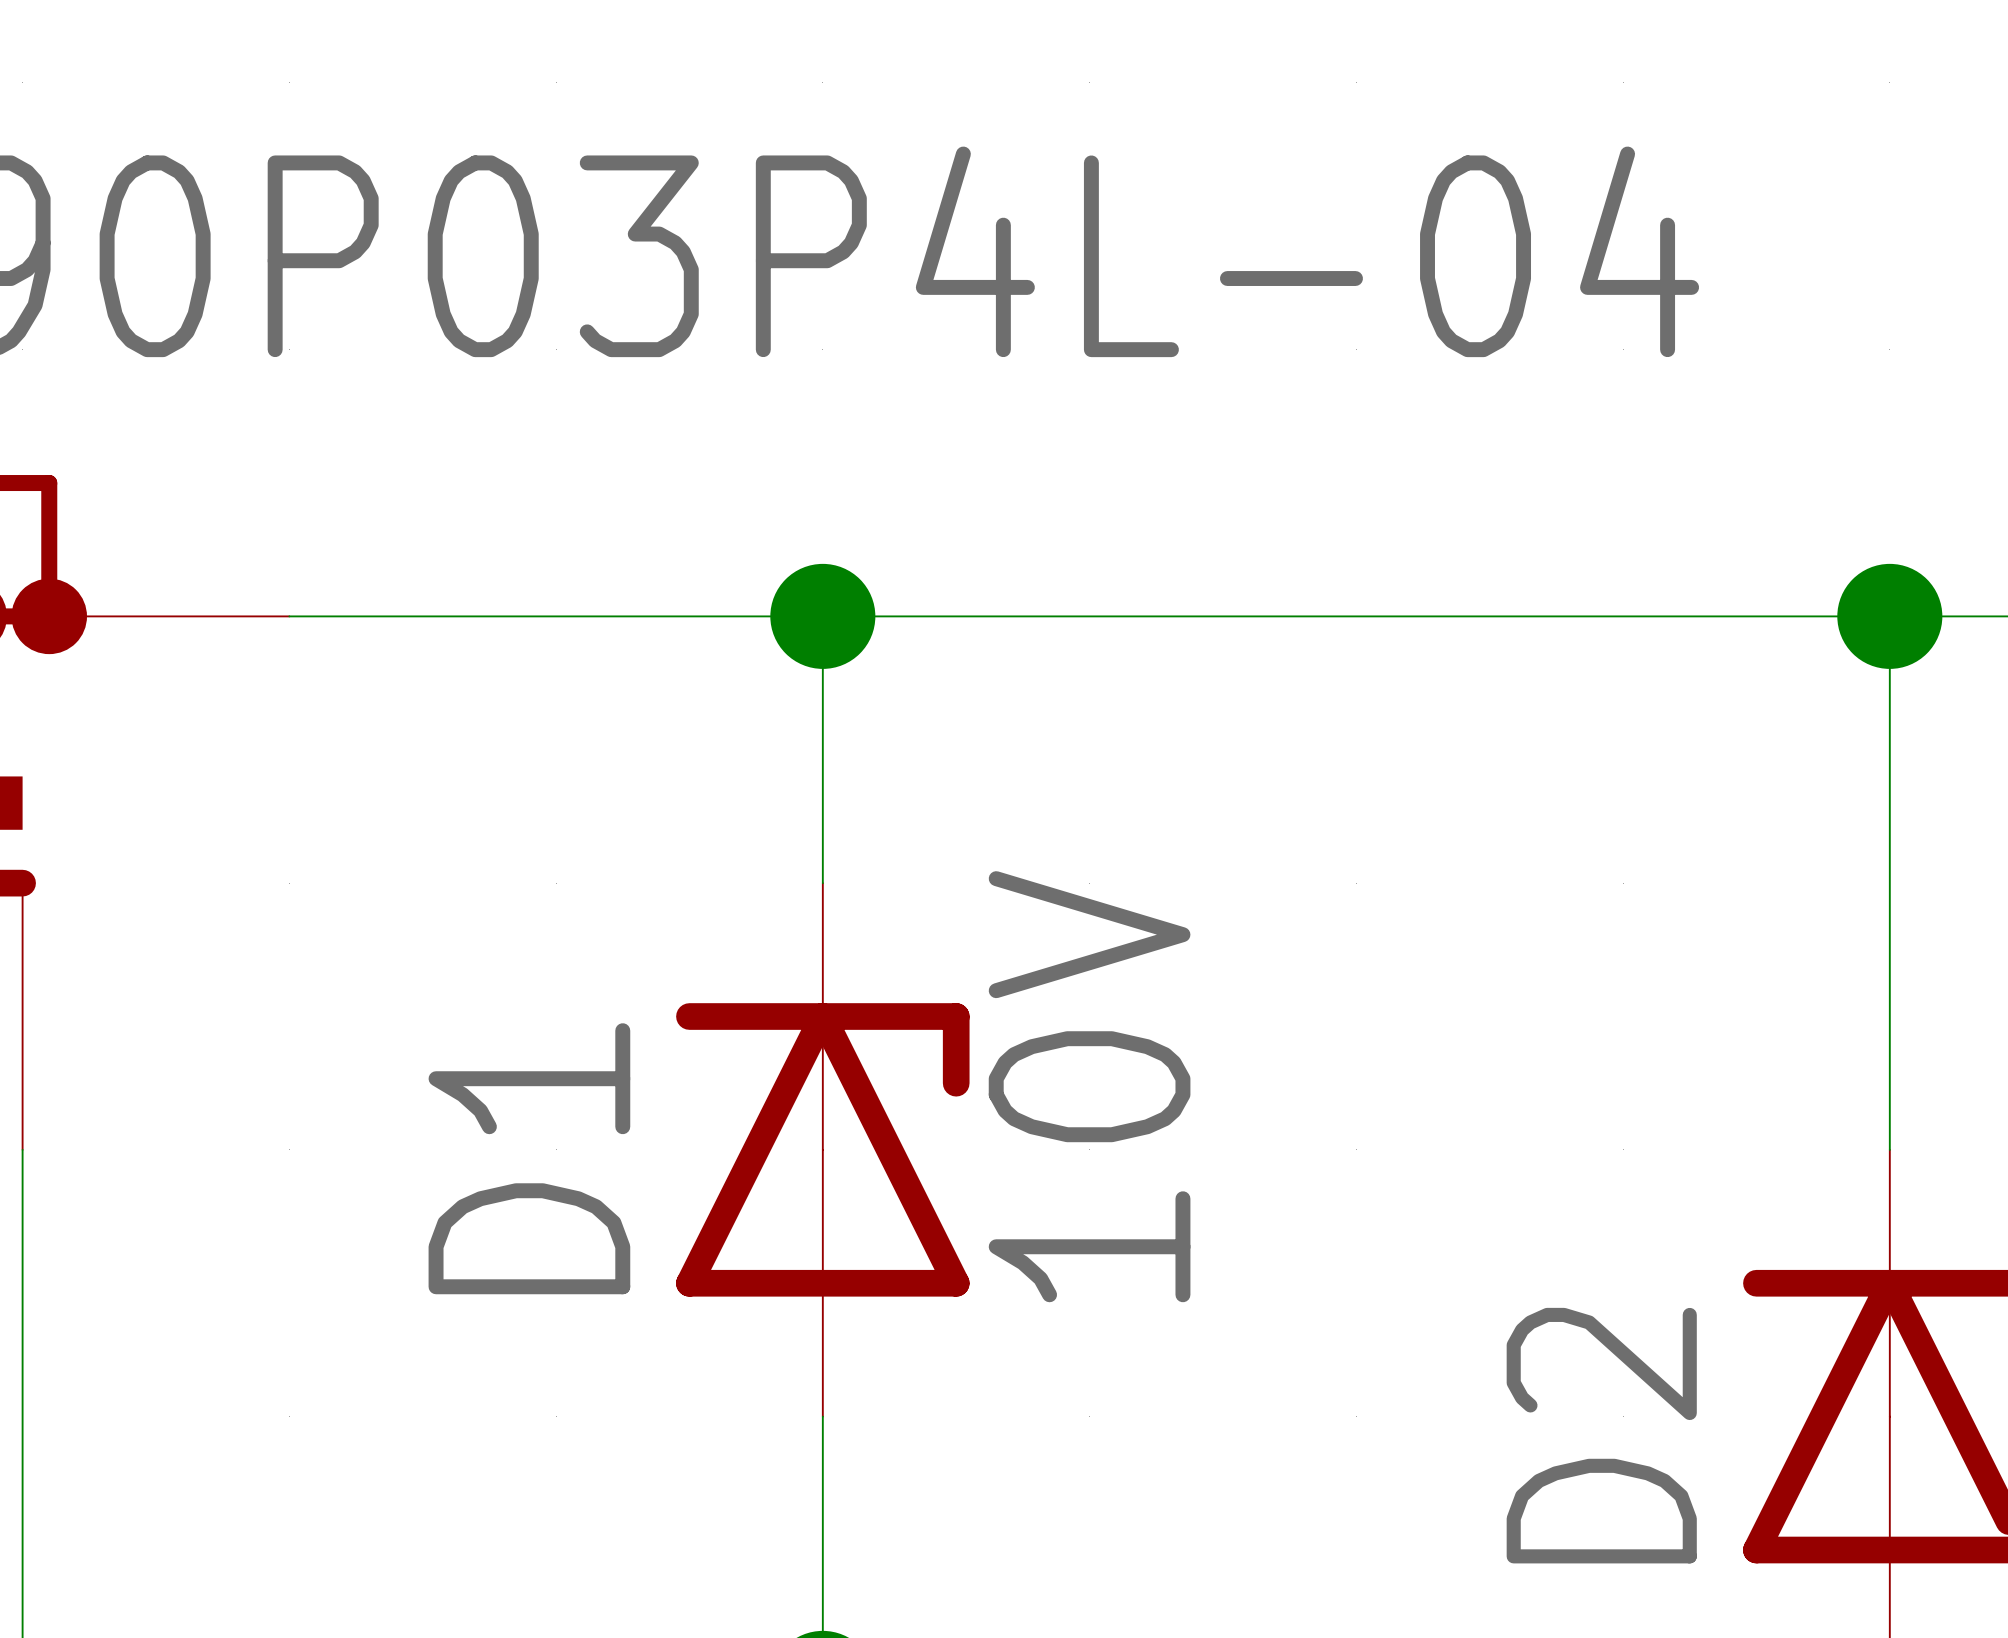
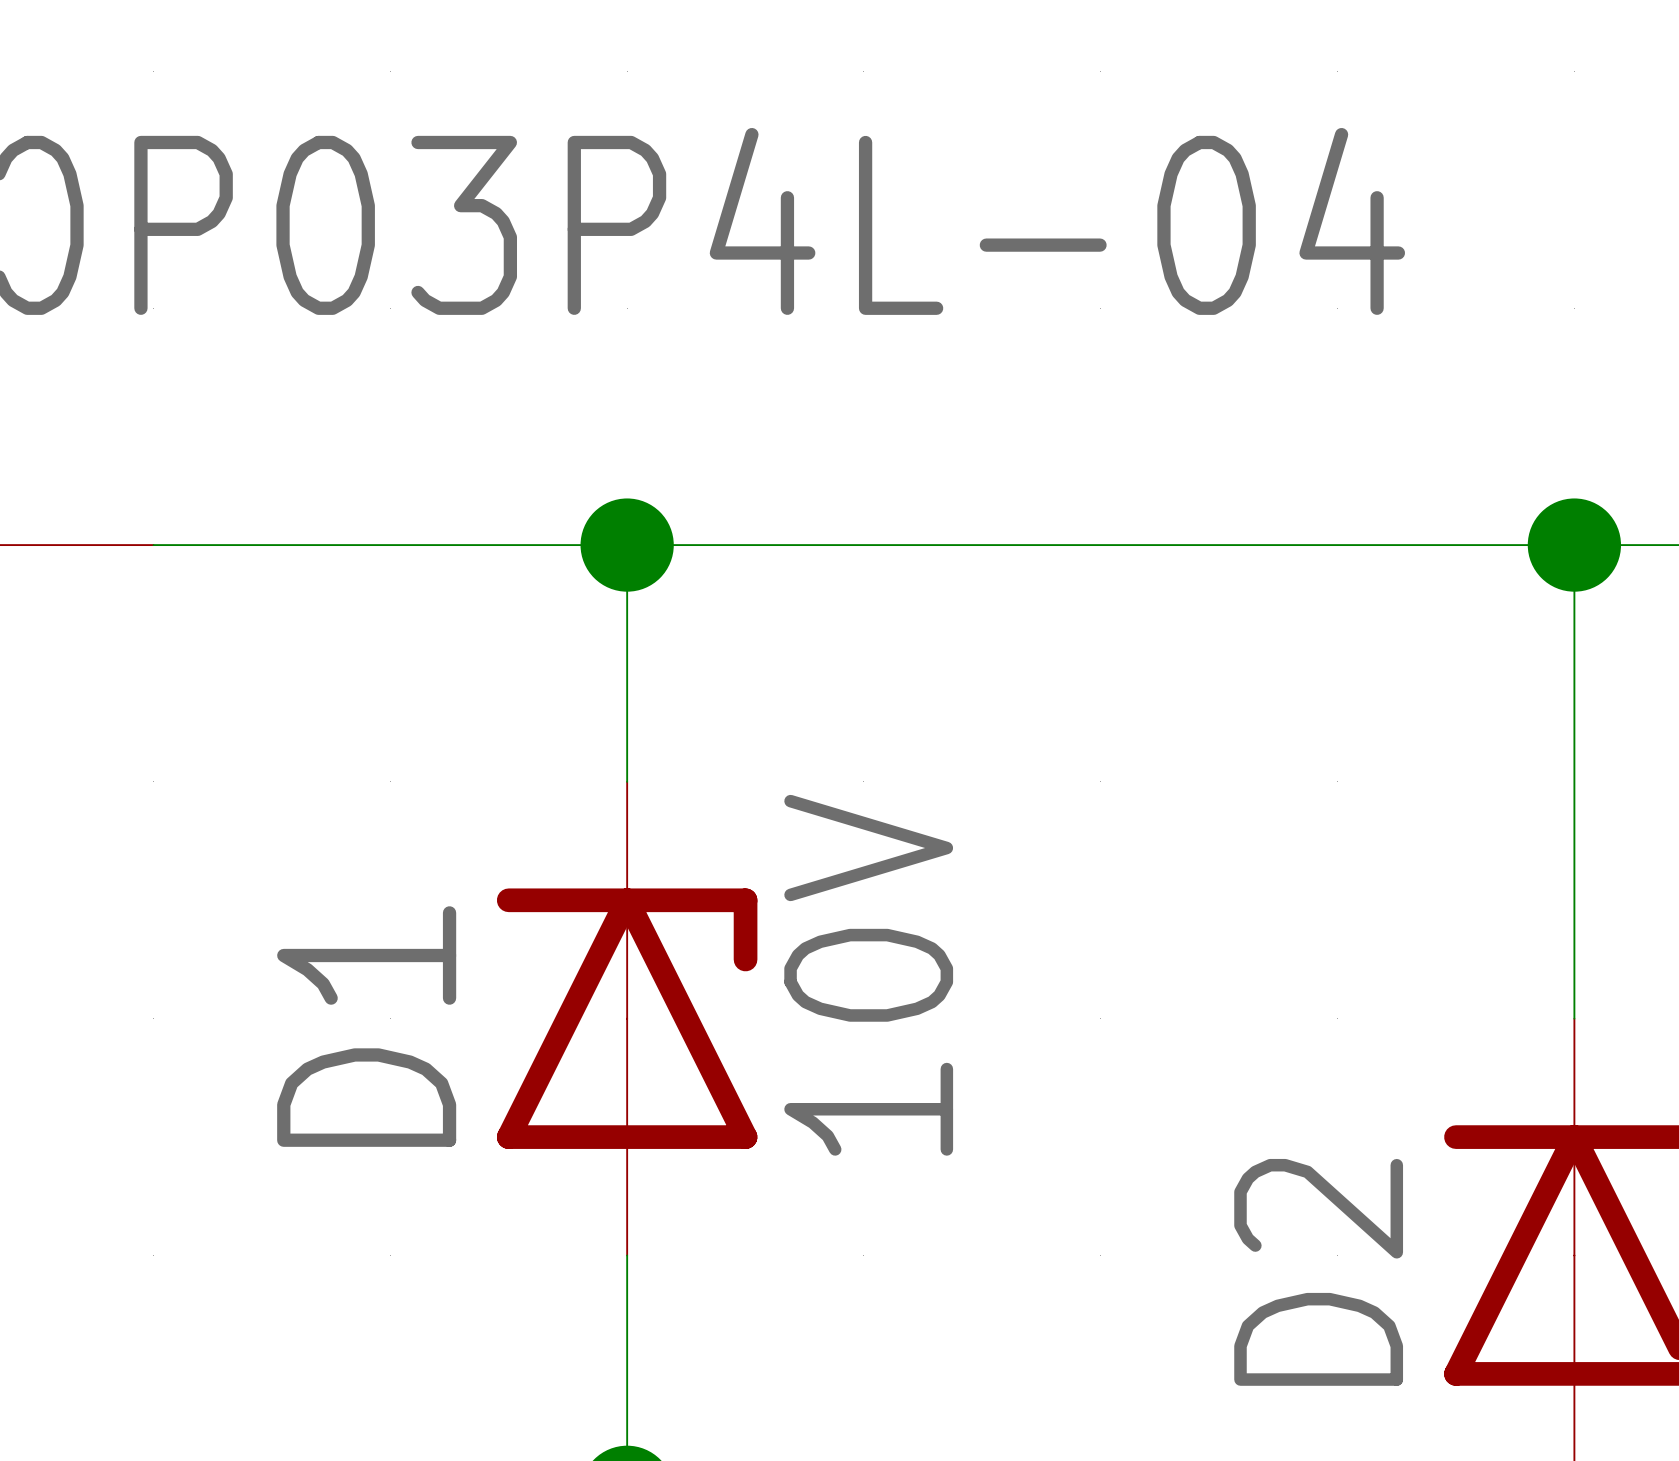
D1 value position: 10V (1089, 1086) -> 10V (868, 975)

